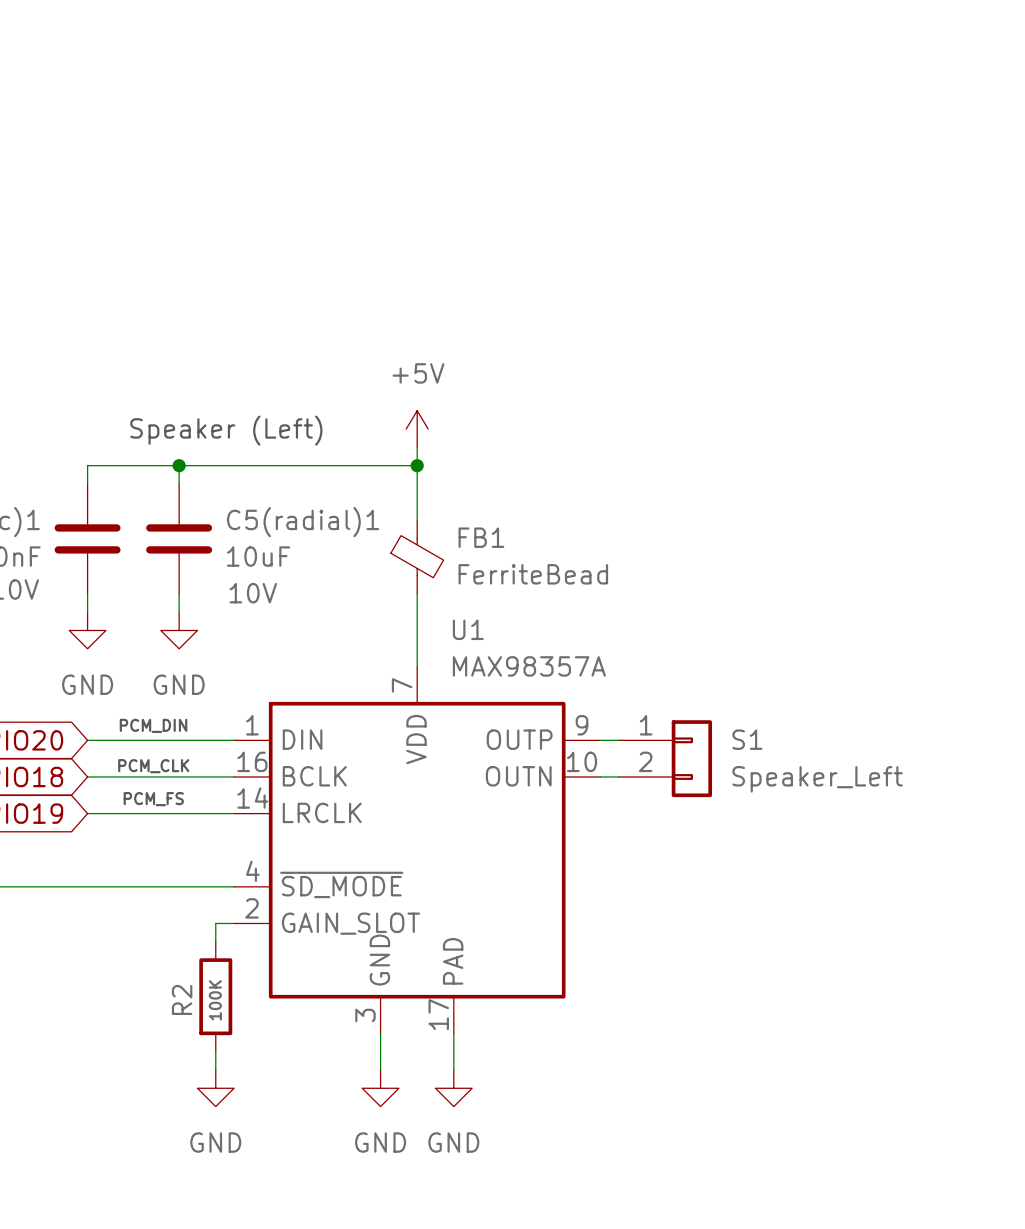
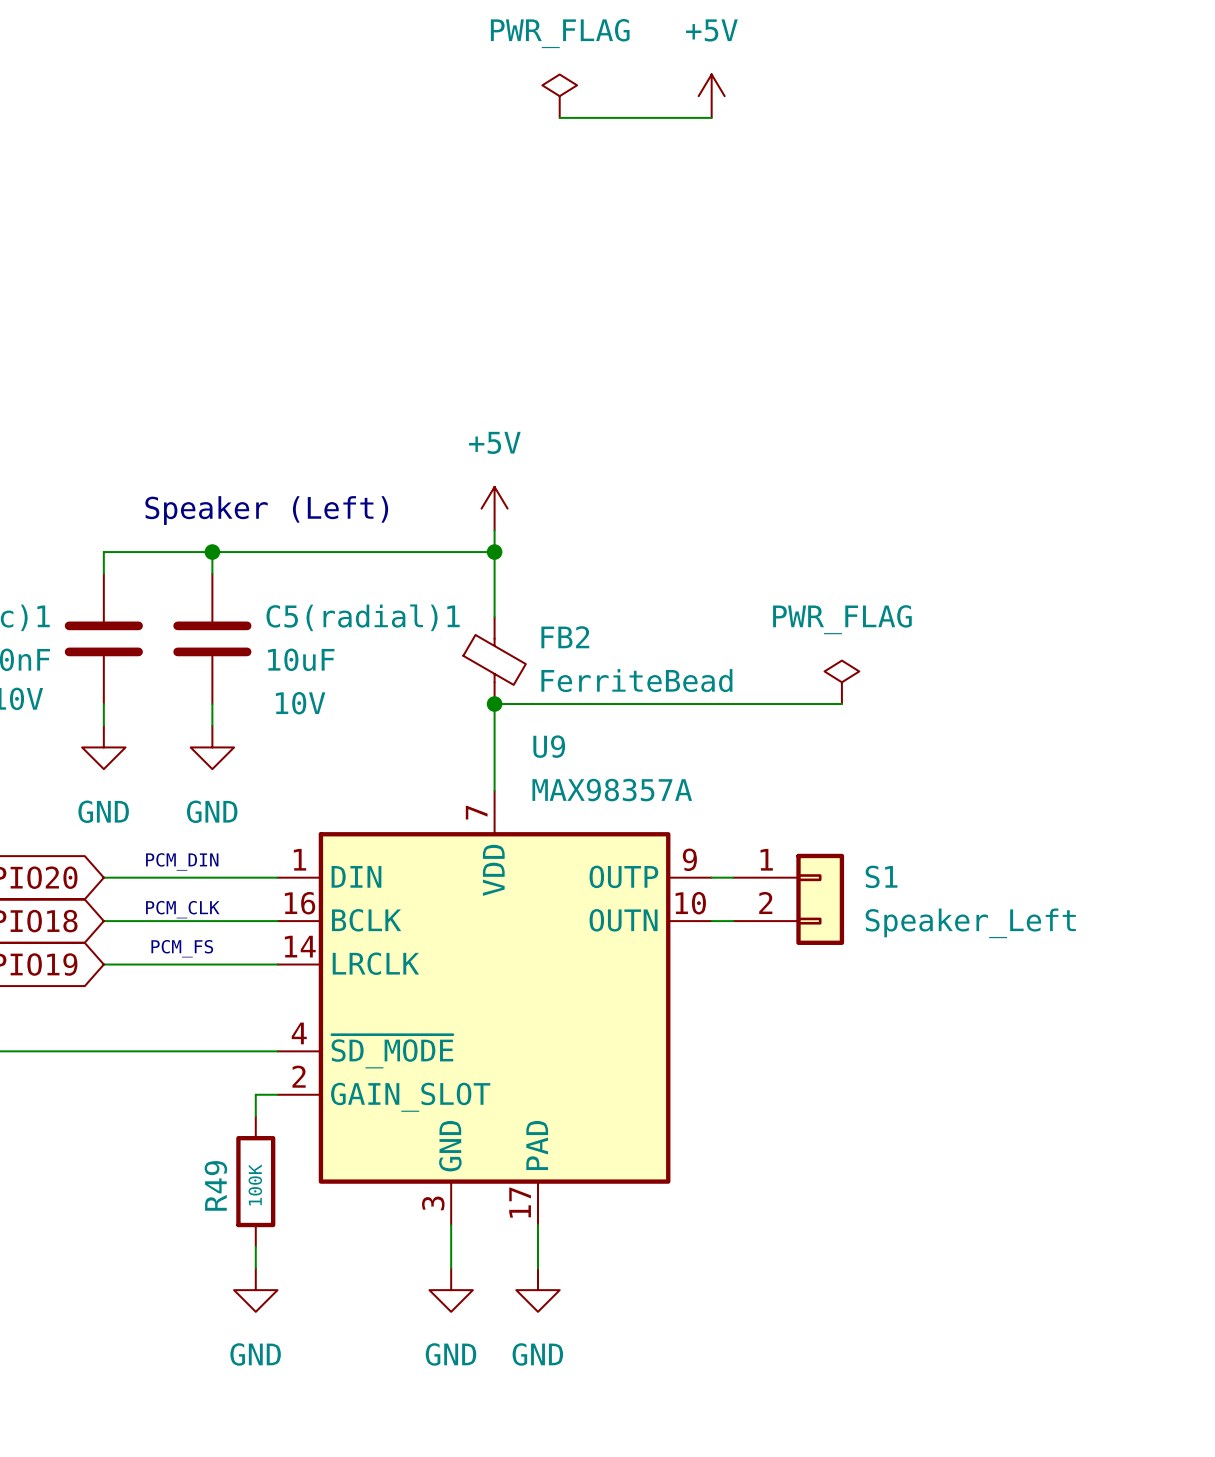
power symbol: none -> PWR_FLAG (559, 96)
power symbol: none -> +5V (711, 96)
wire: none -> (559, 117) (711, 117)
FB1 name: FB1 (481, 537) -> FB2 (565, 637)
power symbol: none -> PWR_FLAG (841, 682)
wire: none -> (494, 704) (841, 704)
junction: none -> (494, 704)
U1 name: U1 (468, 629) -> U9 (549, 746)
R2 name: R2 (182, 999) -> R49 (215, 1185)

